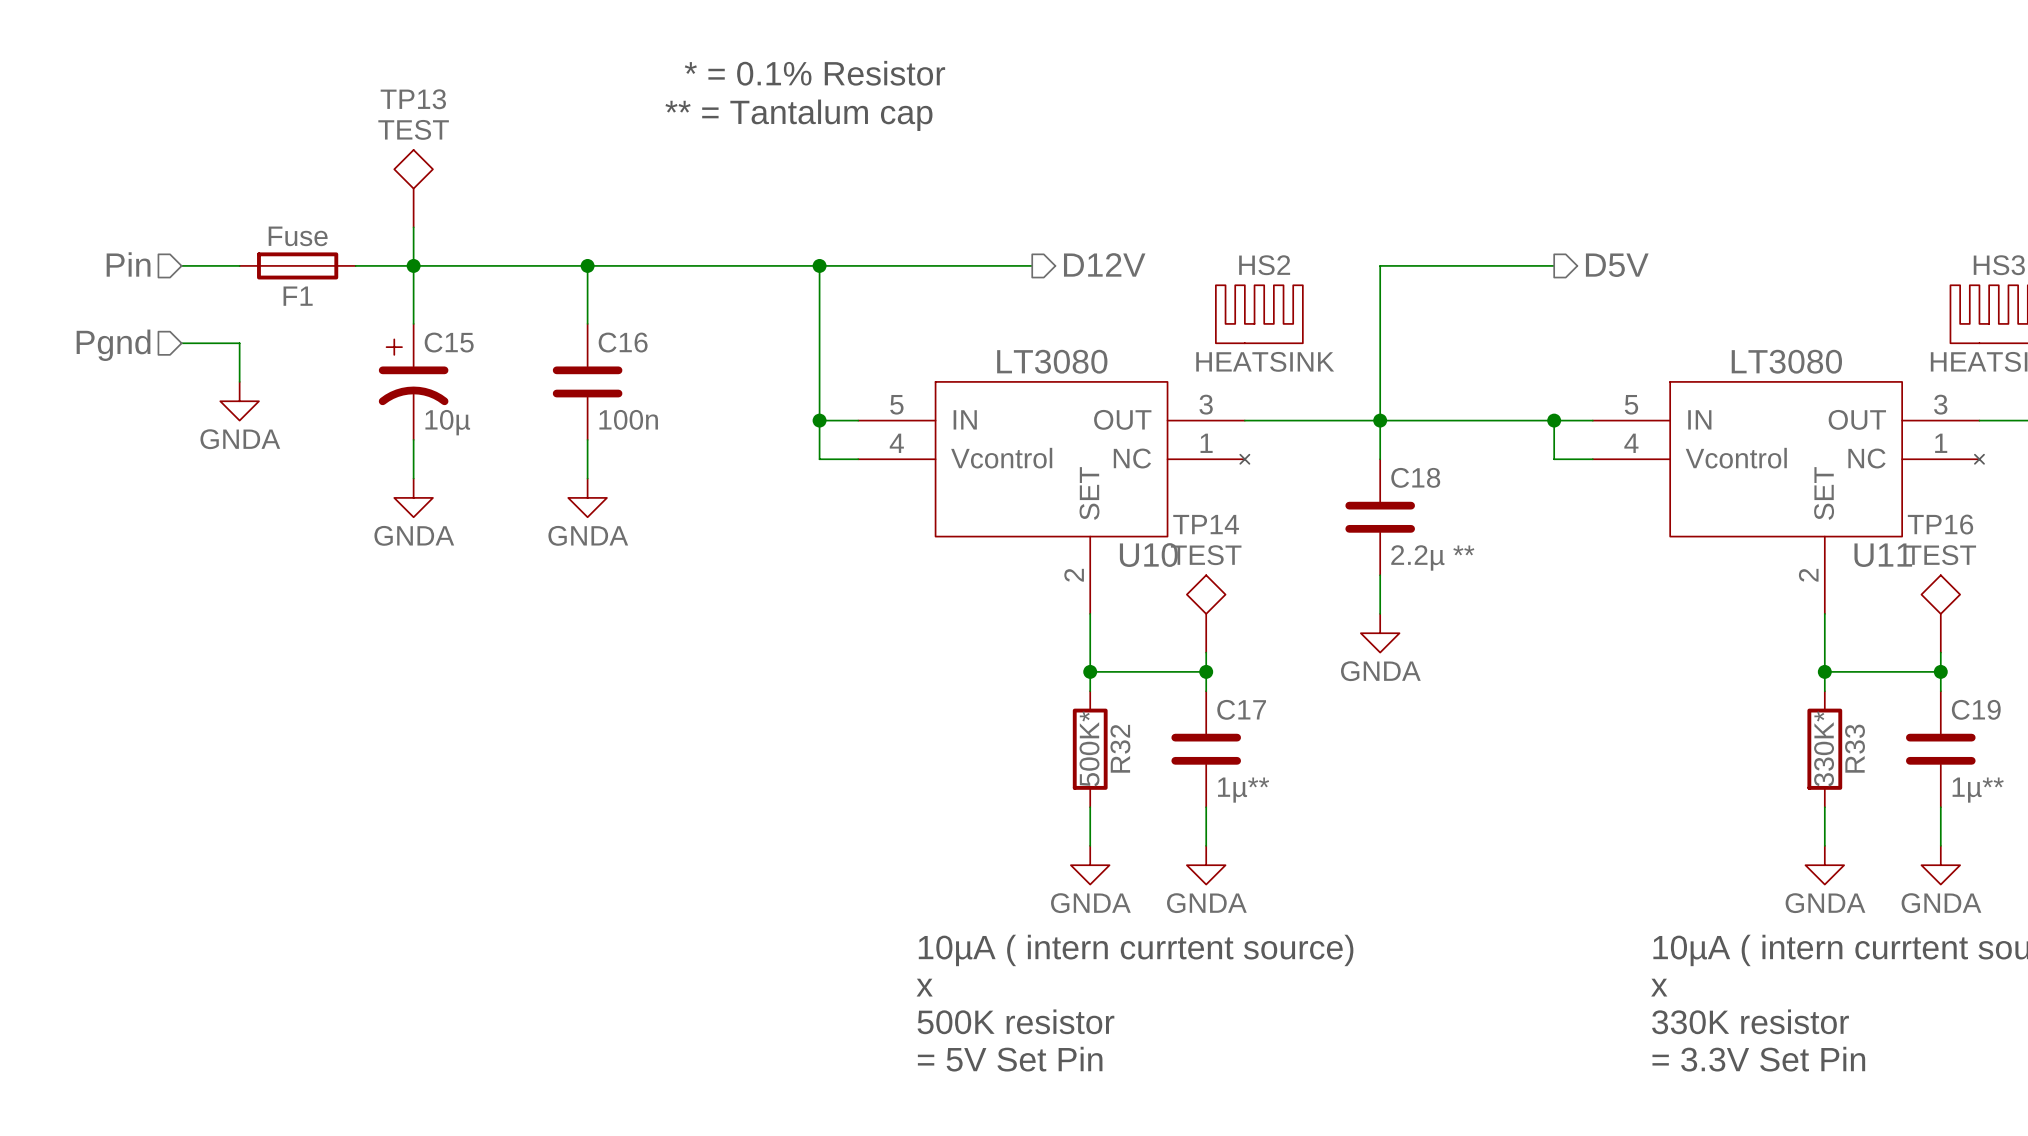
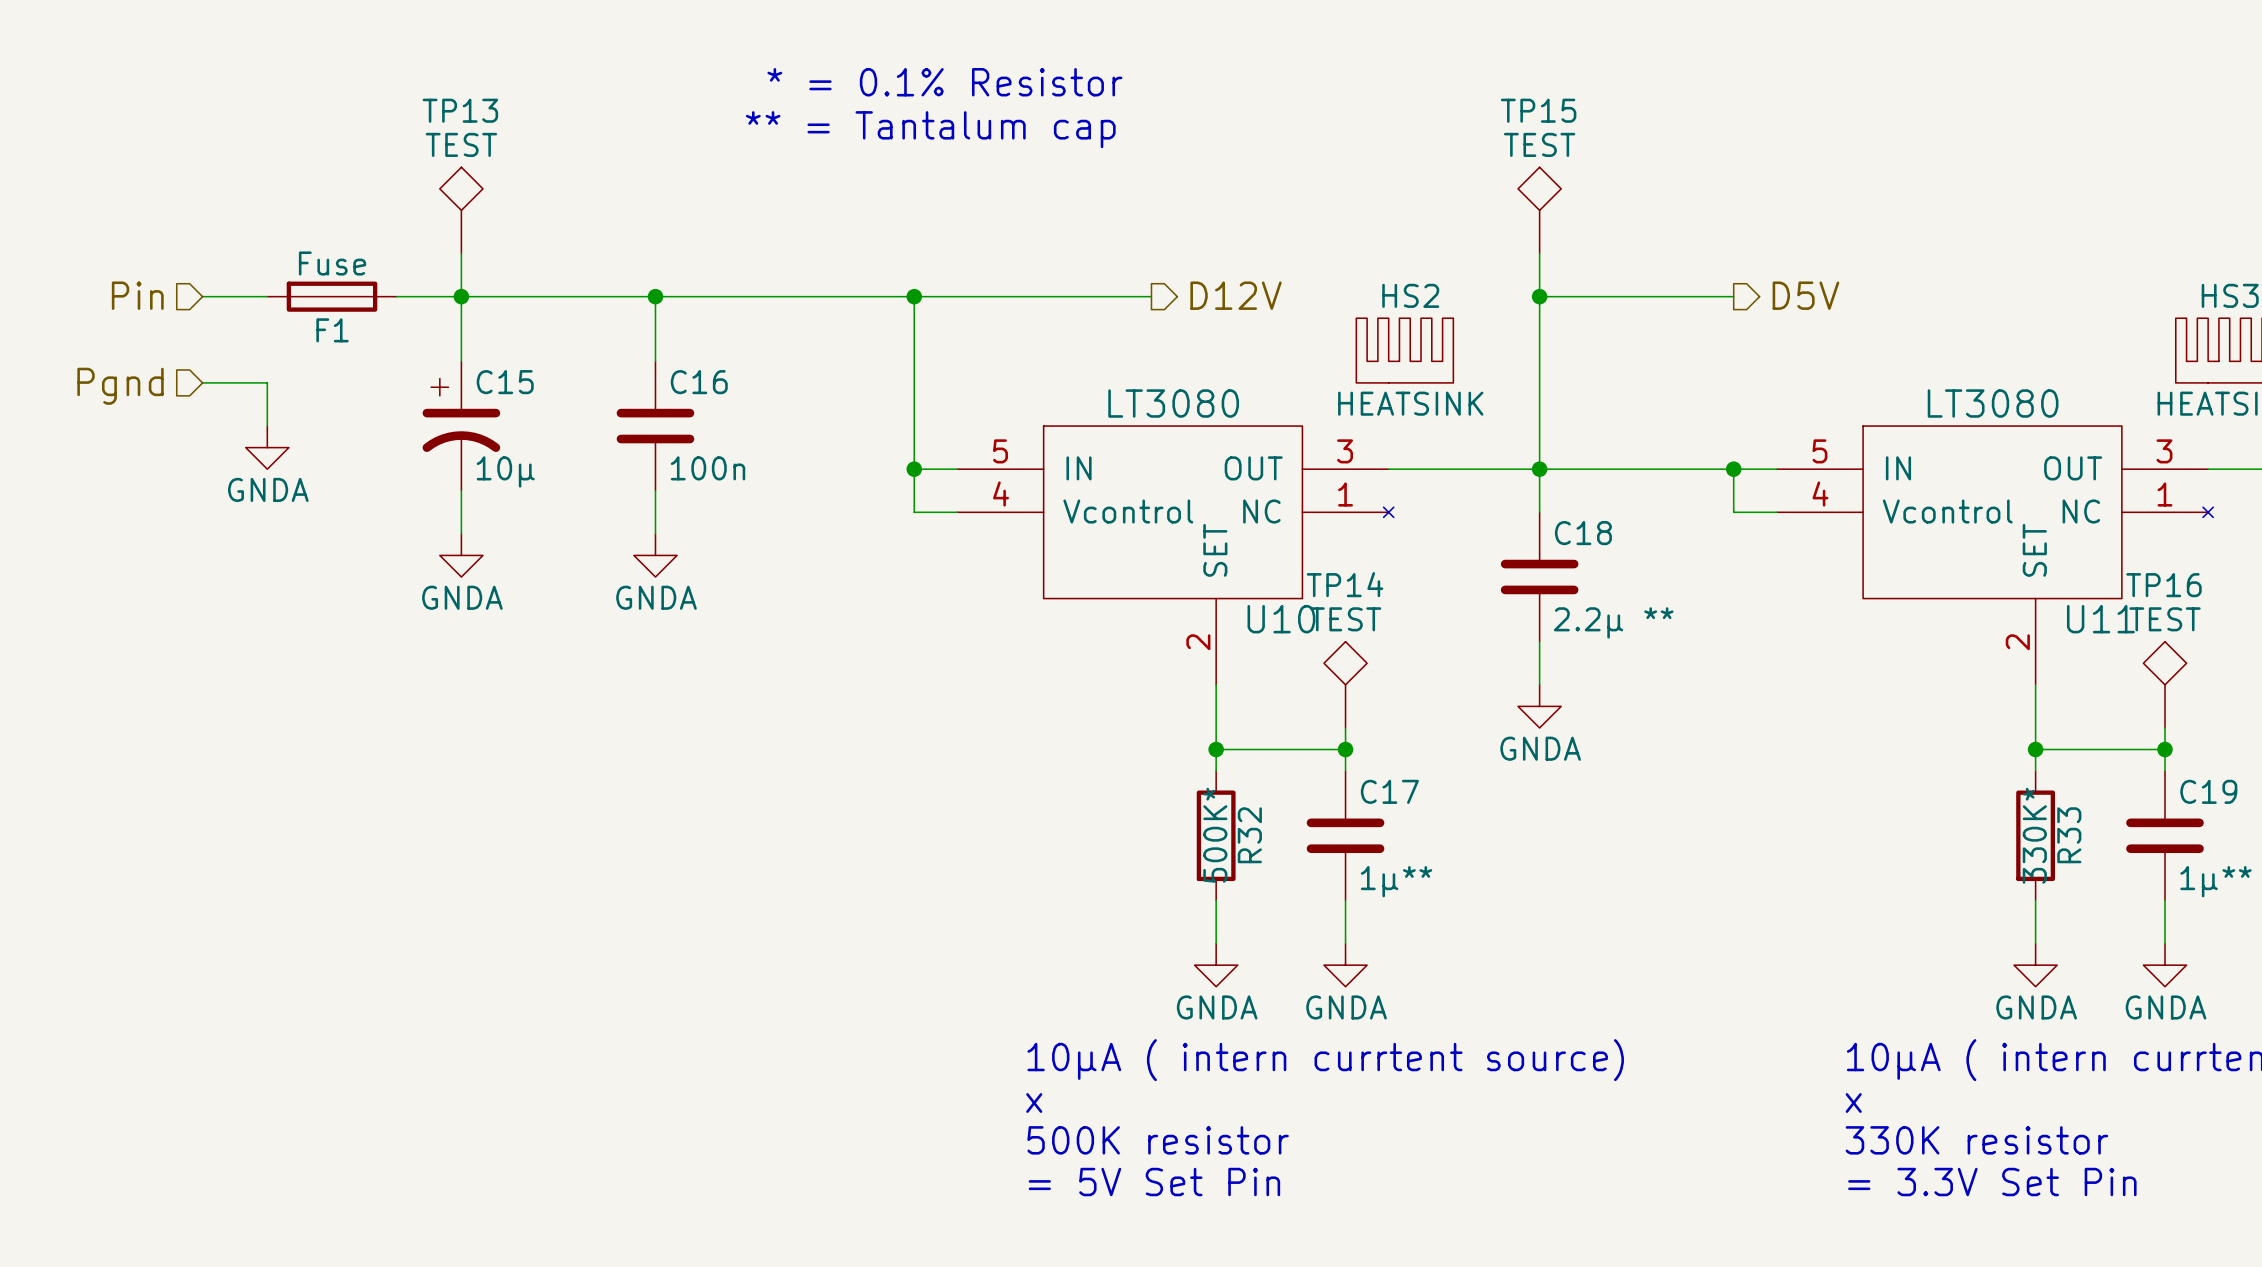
TP15: none -> TEST (1539, 210)
wire: none -> (1539, 253) (1539, 296)
junction: none -> (1539, 296)

